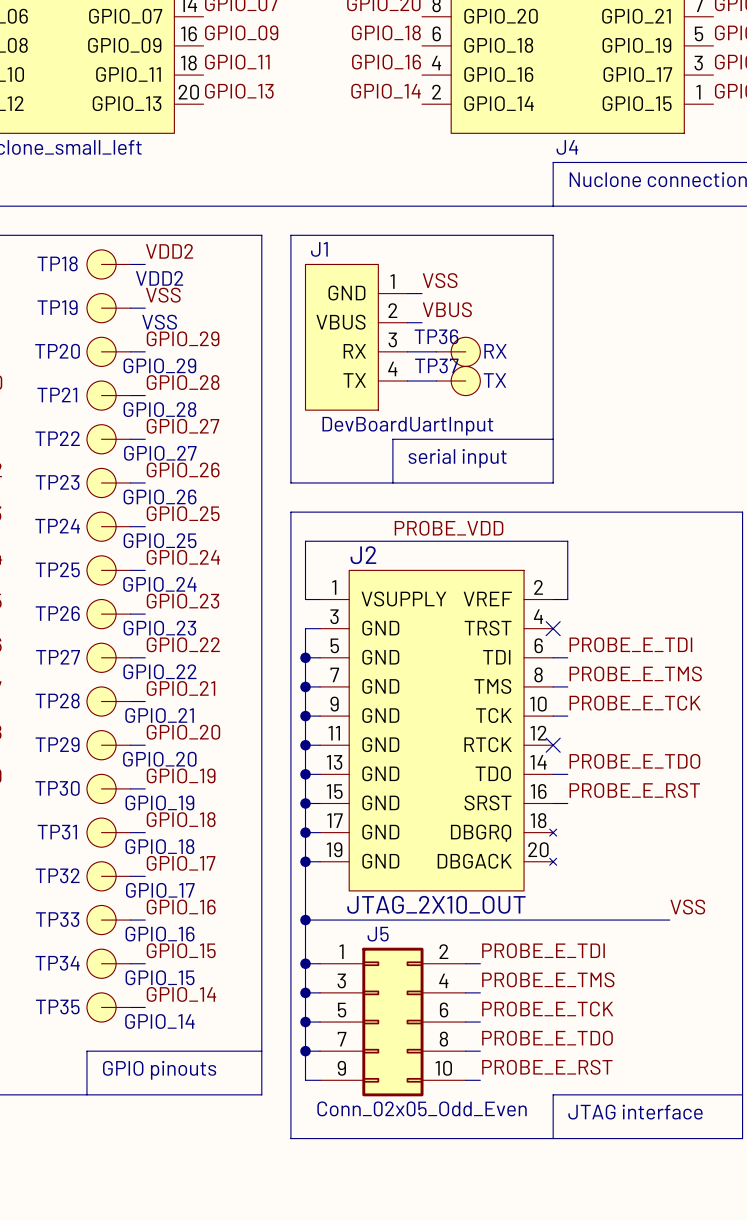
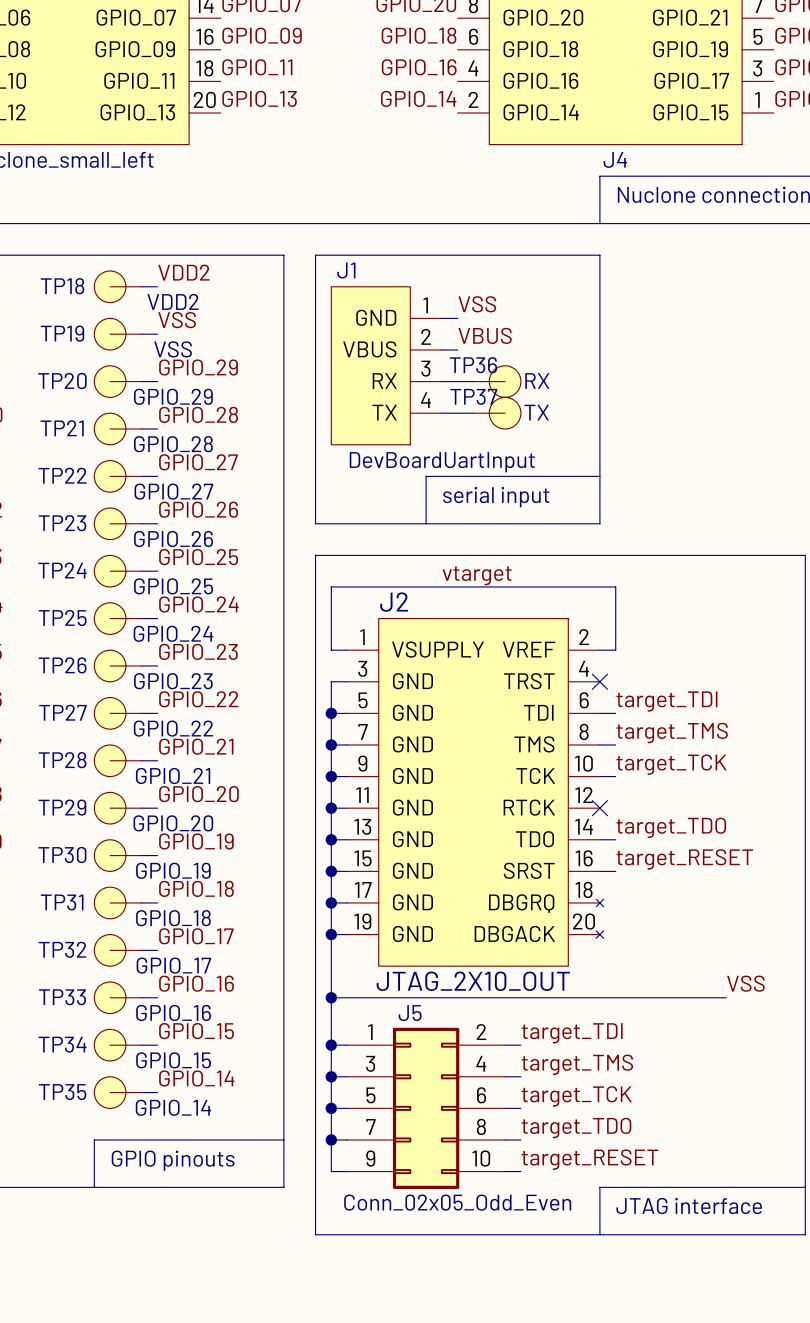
label: PROBE_VDD (449, 528) -> none
label: none -> vtarget (477, 575)
label: PROBE_E_TDI (630, 644) -> target_TDI (666, 701)
label: PROBE_E_TMS (635, 673) -> target_TMS (672, 733)
label: PROBE_E_TCK (635, 703) -> target_TCK (671, 764)
label: PROBE_E_TDO (634, 761) -> target_TDO (671, 827)
label: PROBE_E_RST (634, 790) -> target_RESET (684, 859)
label: PROBE_E_TDI (543, 950) -> target_TDI (572, 1033)
label: PROBE_E_TMS (548, 979) -> target_TMS (577, 1064)
label: PROBE_E_TCK (547, 1009) -> target_TCK (576, 1096)
label: PROBE_E_TDO (547, 1038) -> target_TDO (576, 1128)
label: PROBE_E_RST (547, 1067) -> target_RESET (590, 1159)

